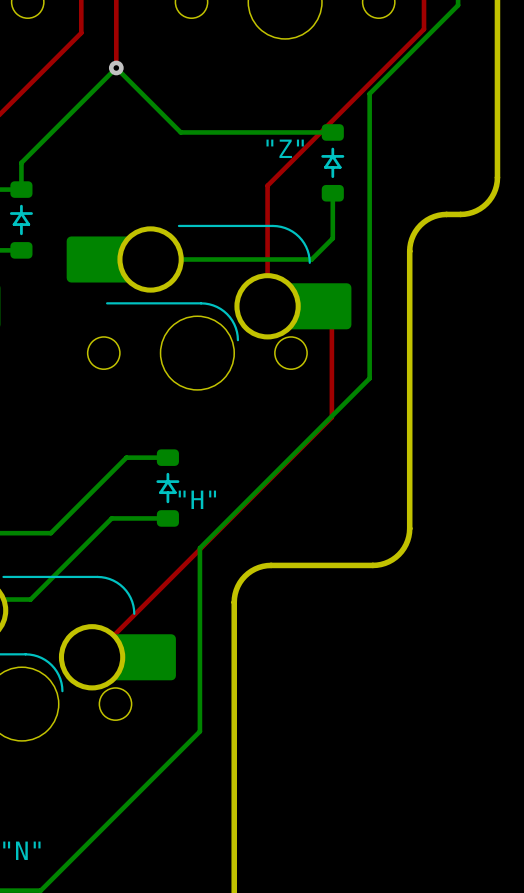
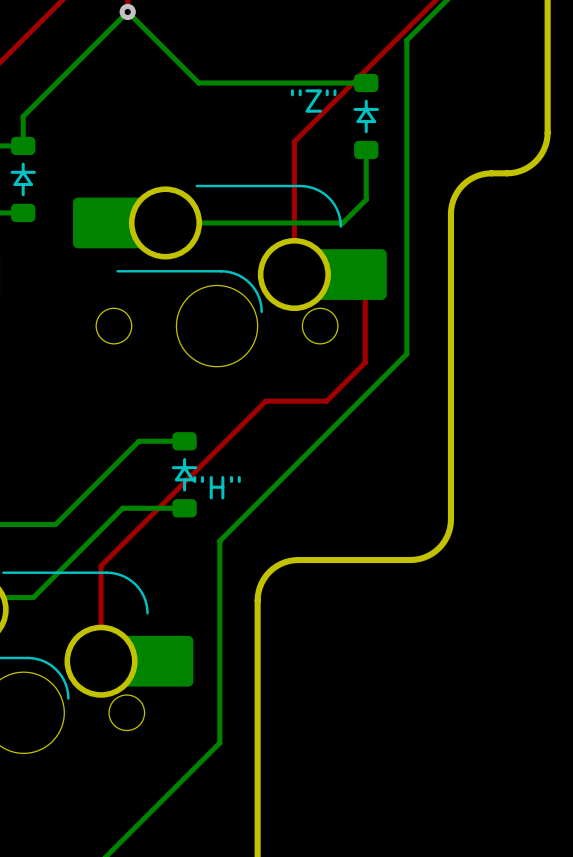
top track: (331, 386) (331, 417) (92, 657) -> (365, 362) (326, 401) (265, 401) (101, 565) (101, 661)

